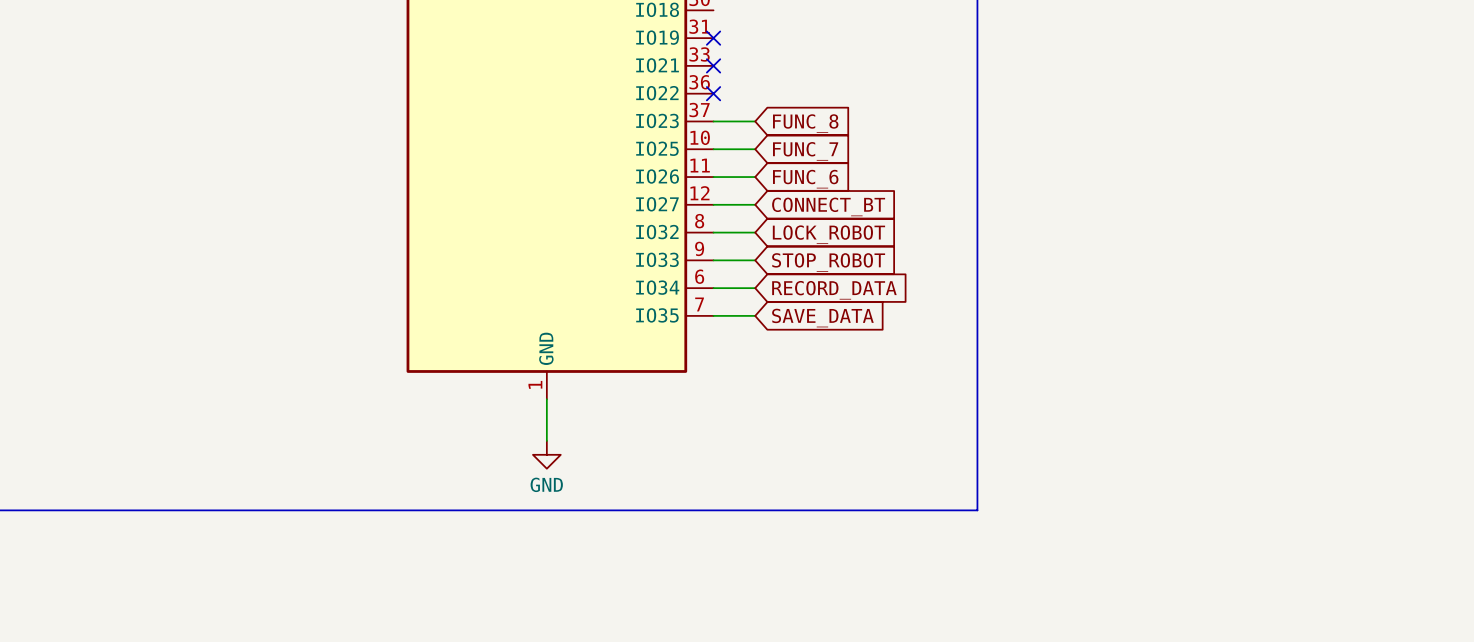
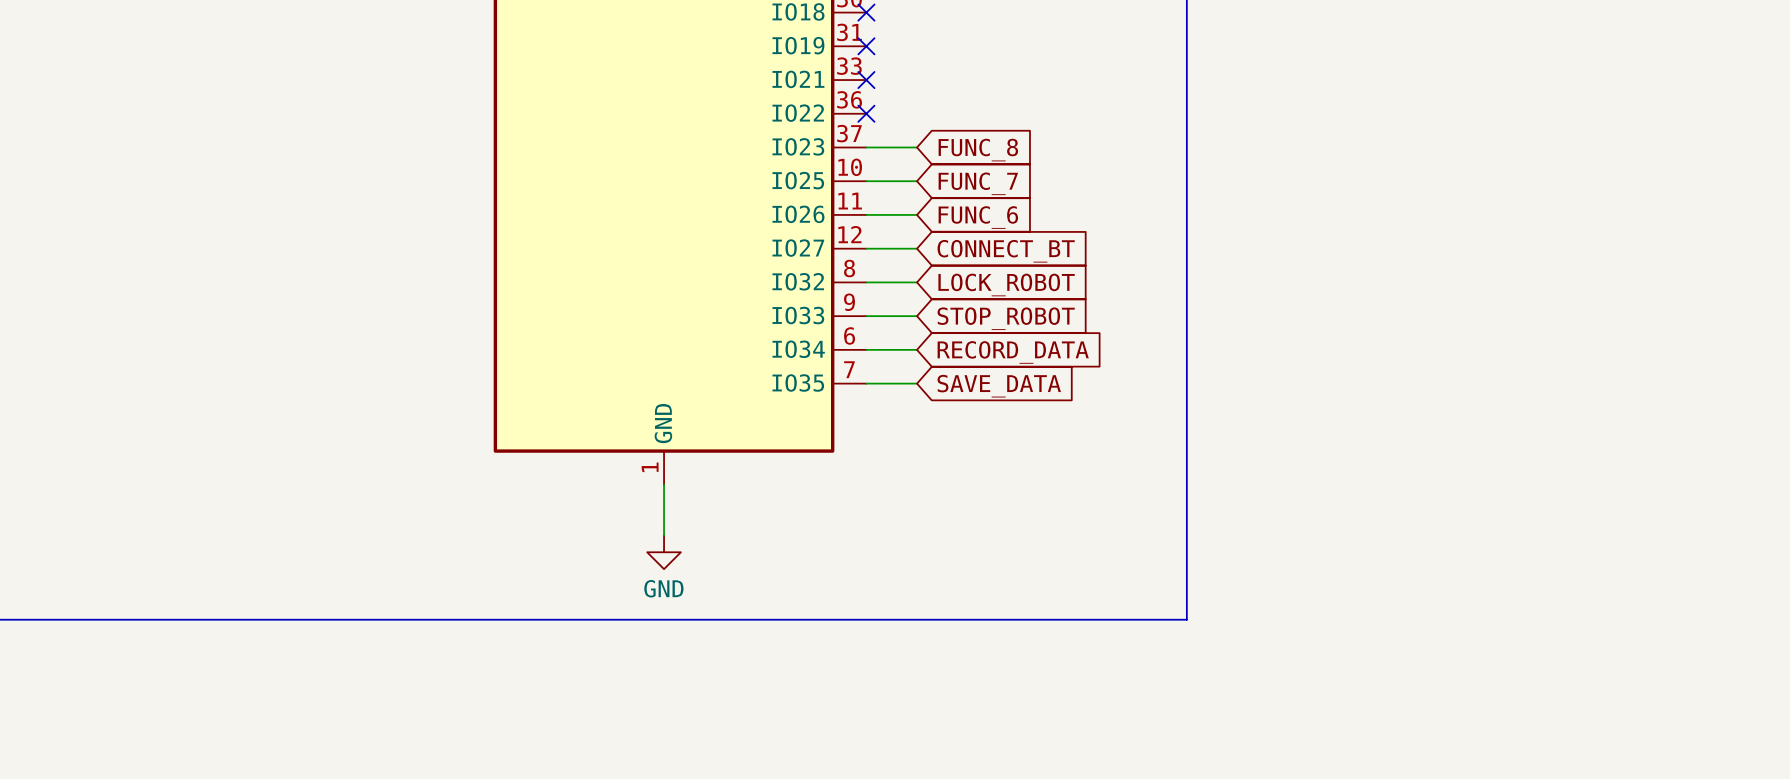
no-connect mark: none -> (866, 12)

